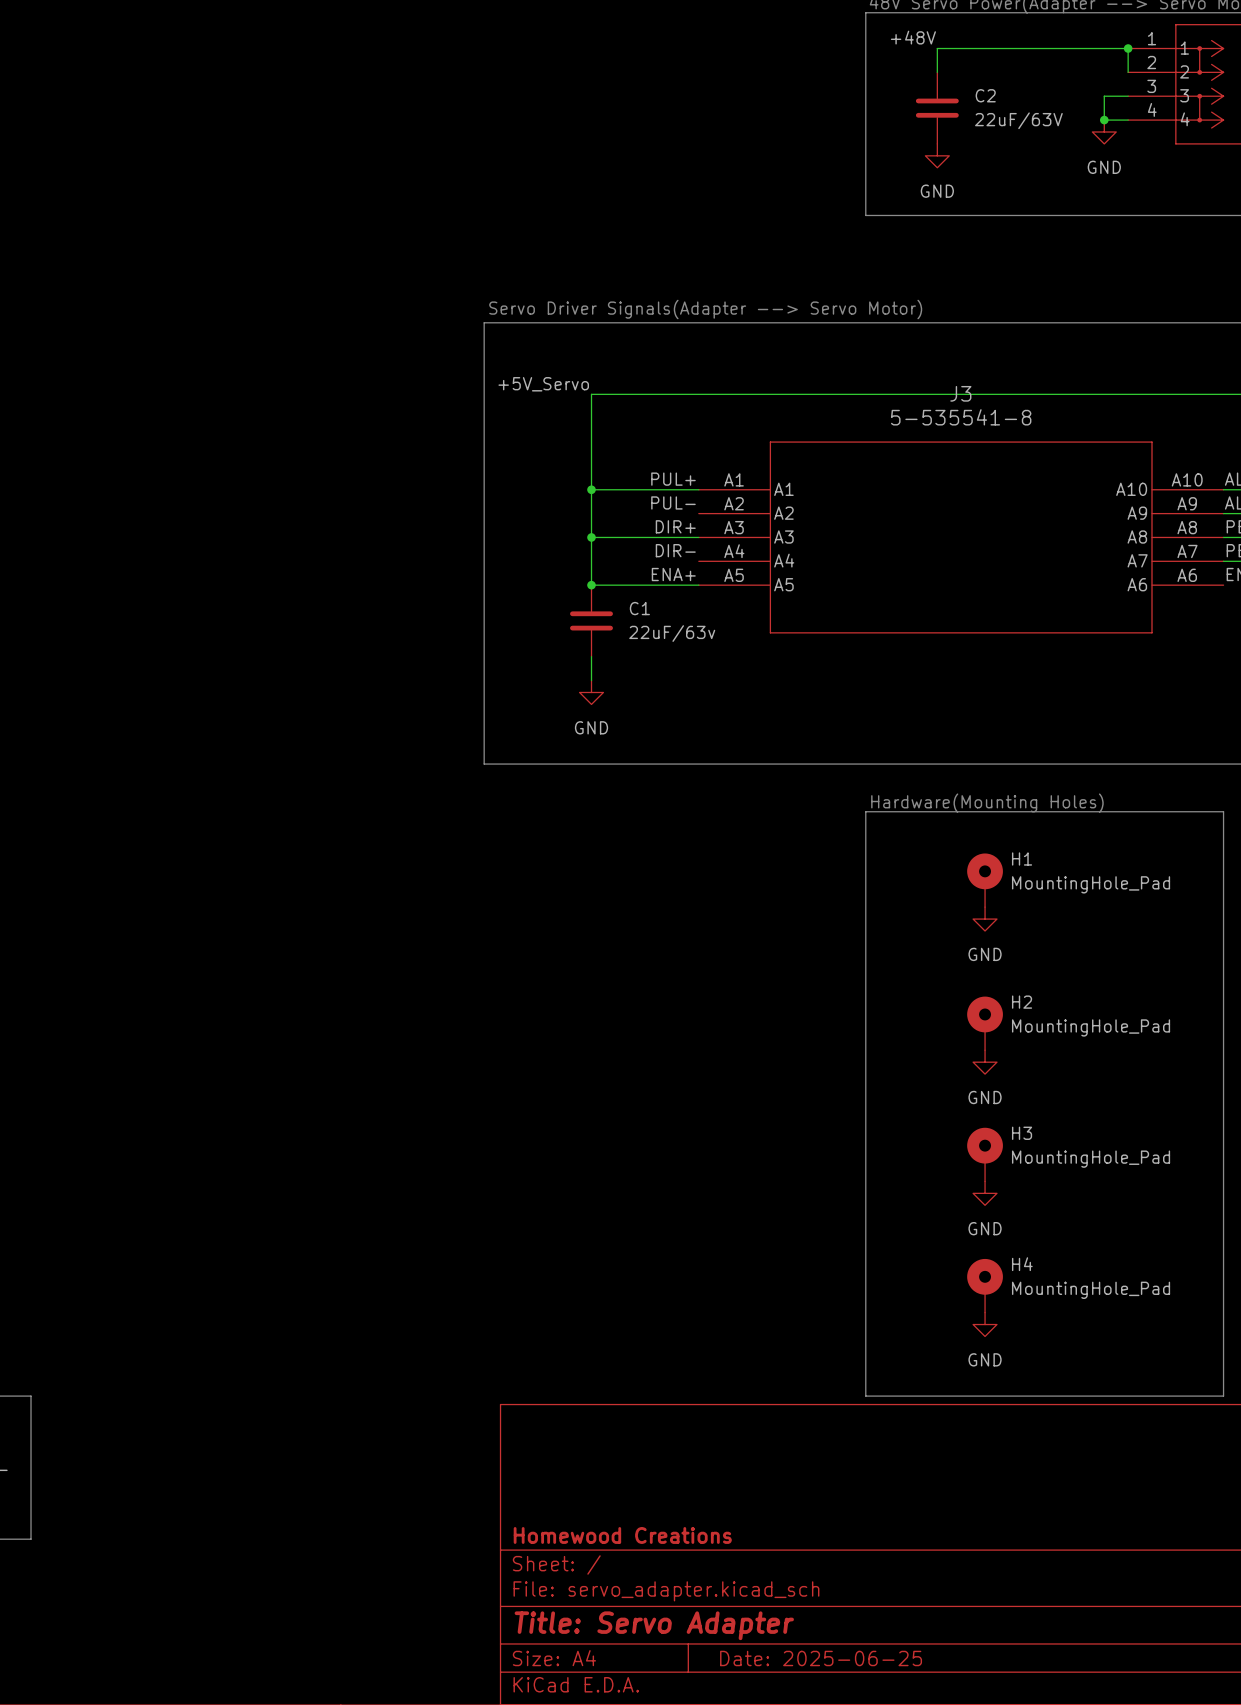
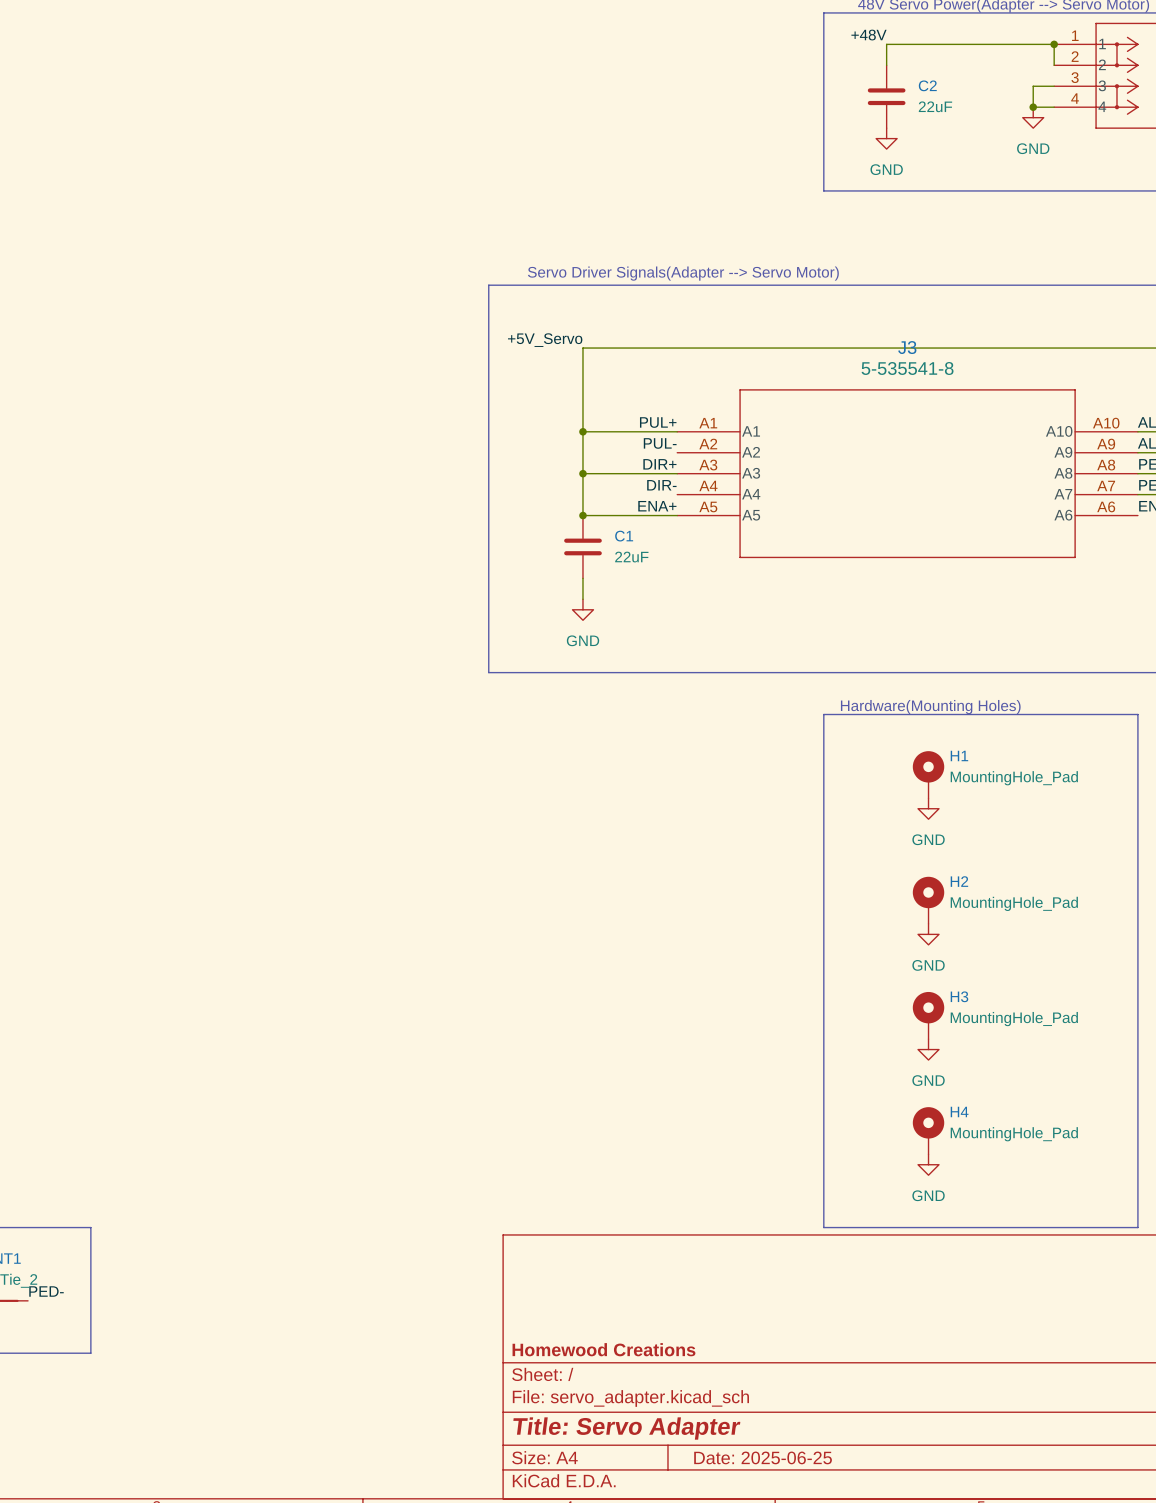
C2 value: 22uF/63V (1018, 120) -> 22uF (935, 106)
C1 value: 22uF/63v (672, 633) -> 22uF (631, 557)

